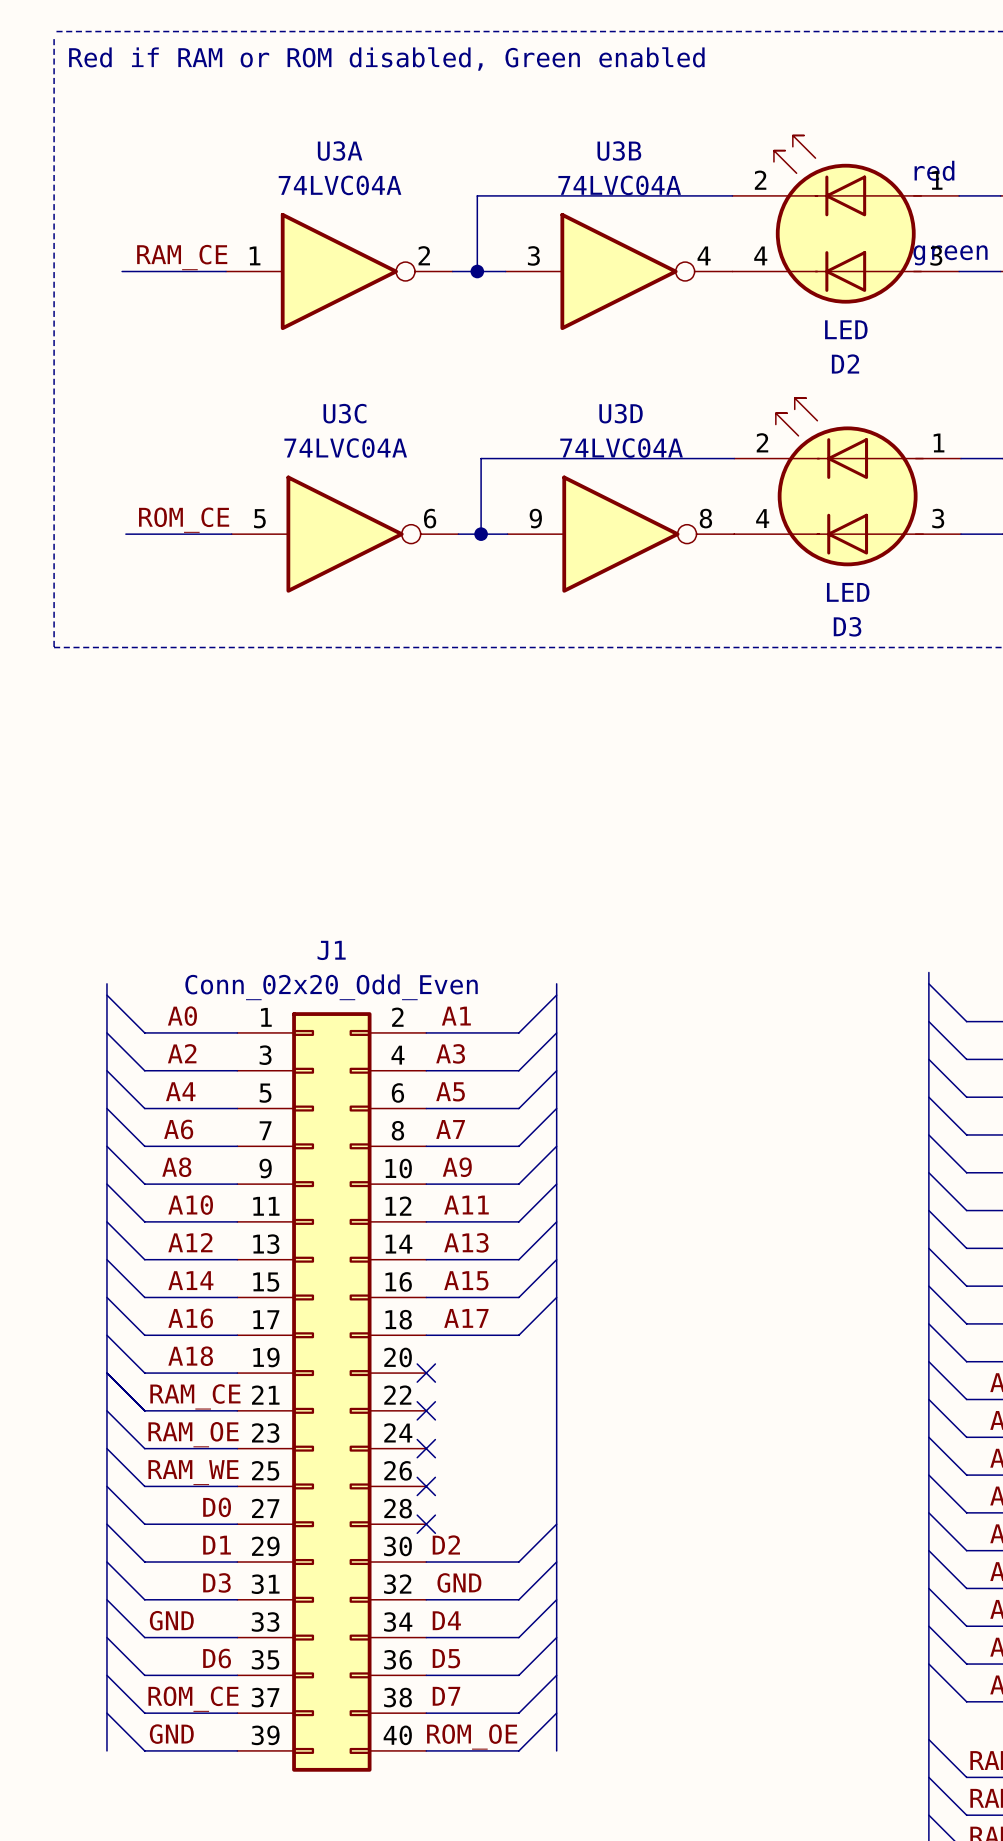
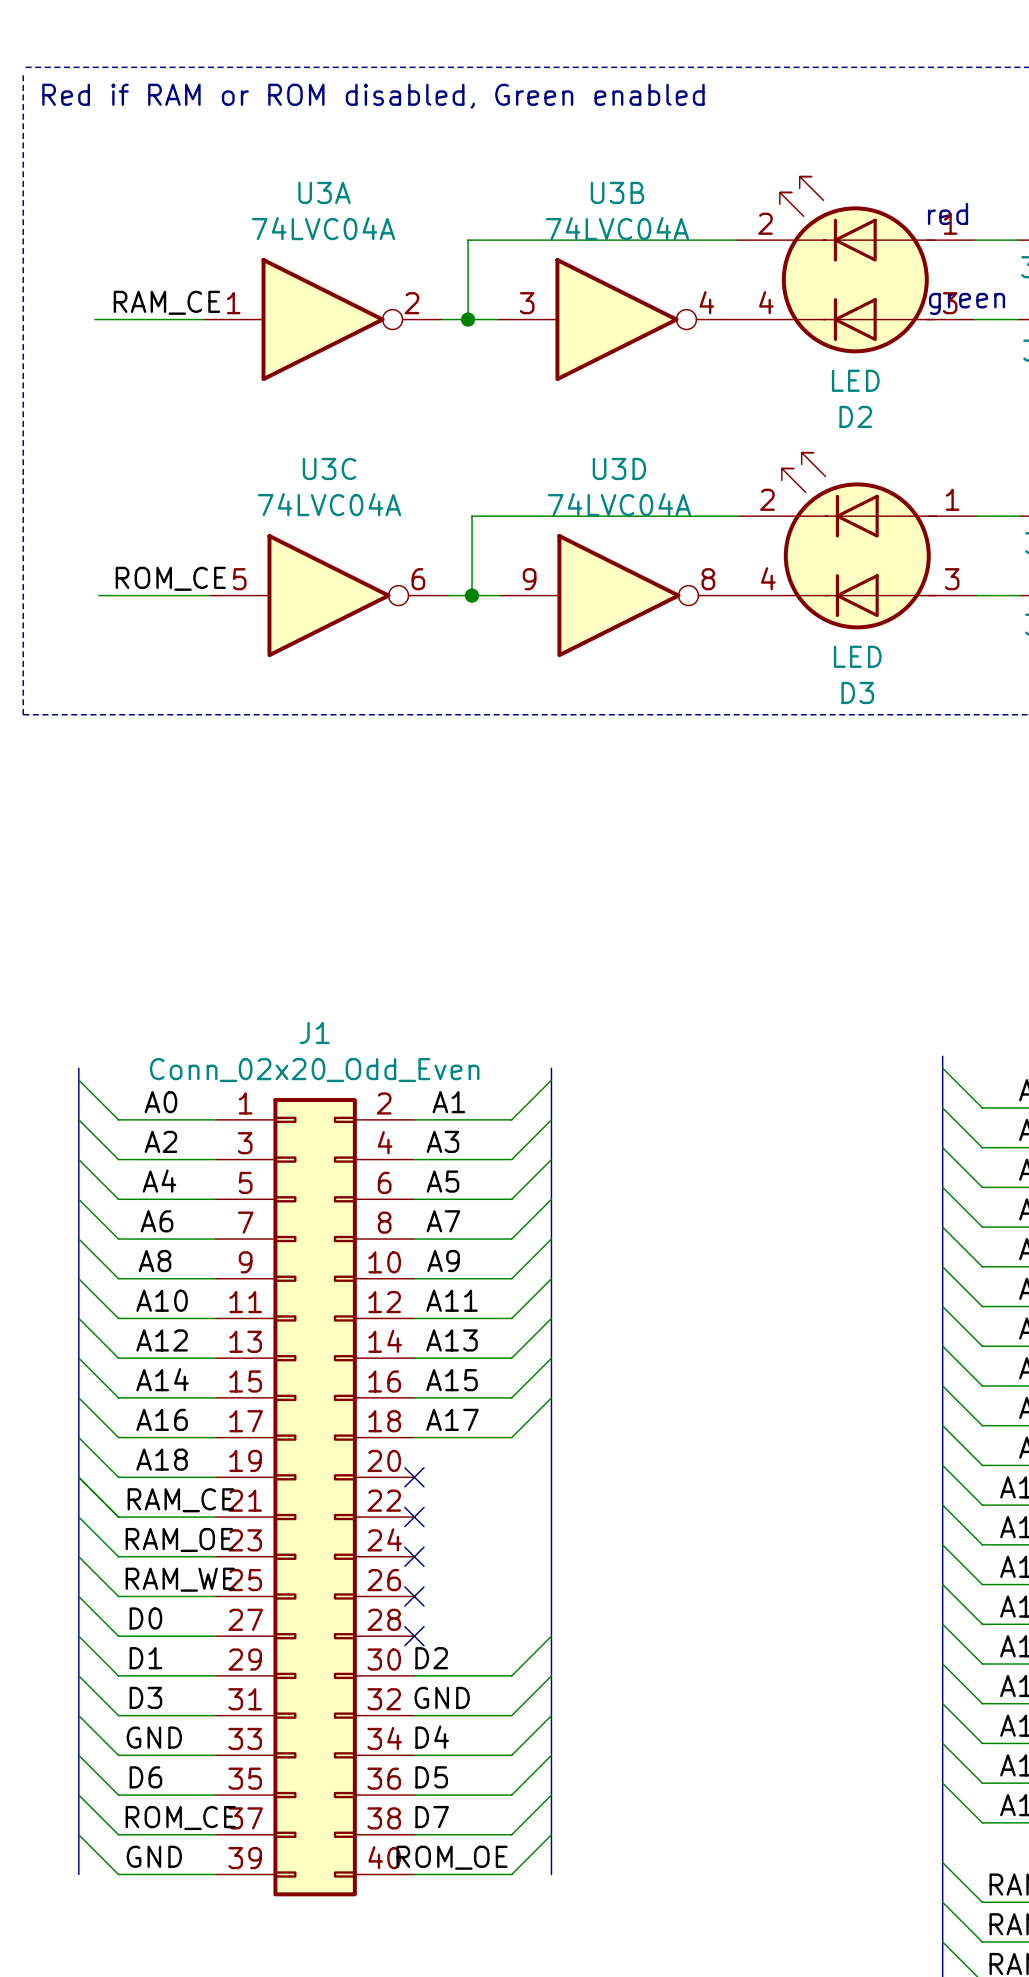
label position: D0 (217, 1507) -> D0 (145, 1618)
label position: D1 (217, 1545) -> D1 (145, 1658)
label position: D3 (216, 1582) -> D3 (145, 1697)
label position: D6 (217, 1658) -> D6 (145, 1777)

